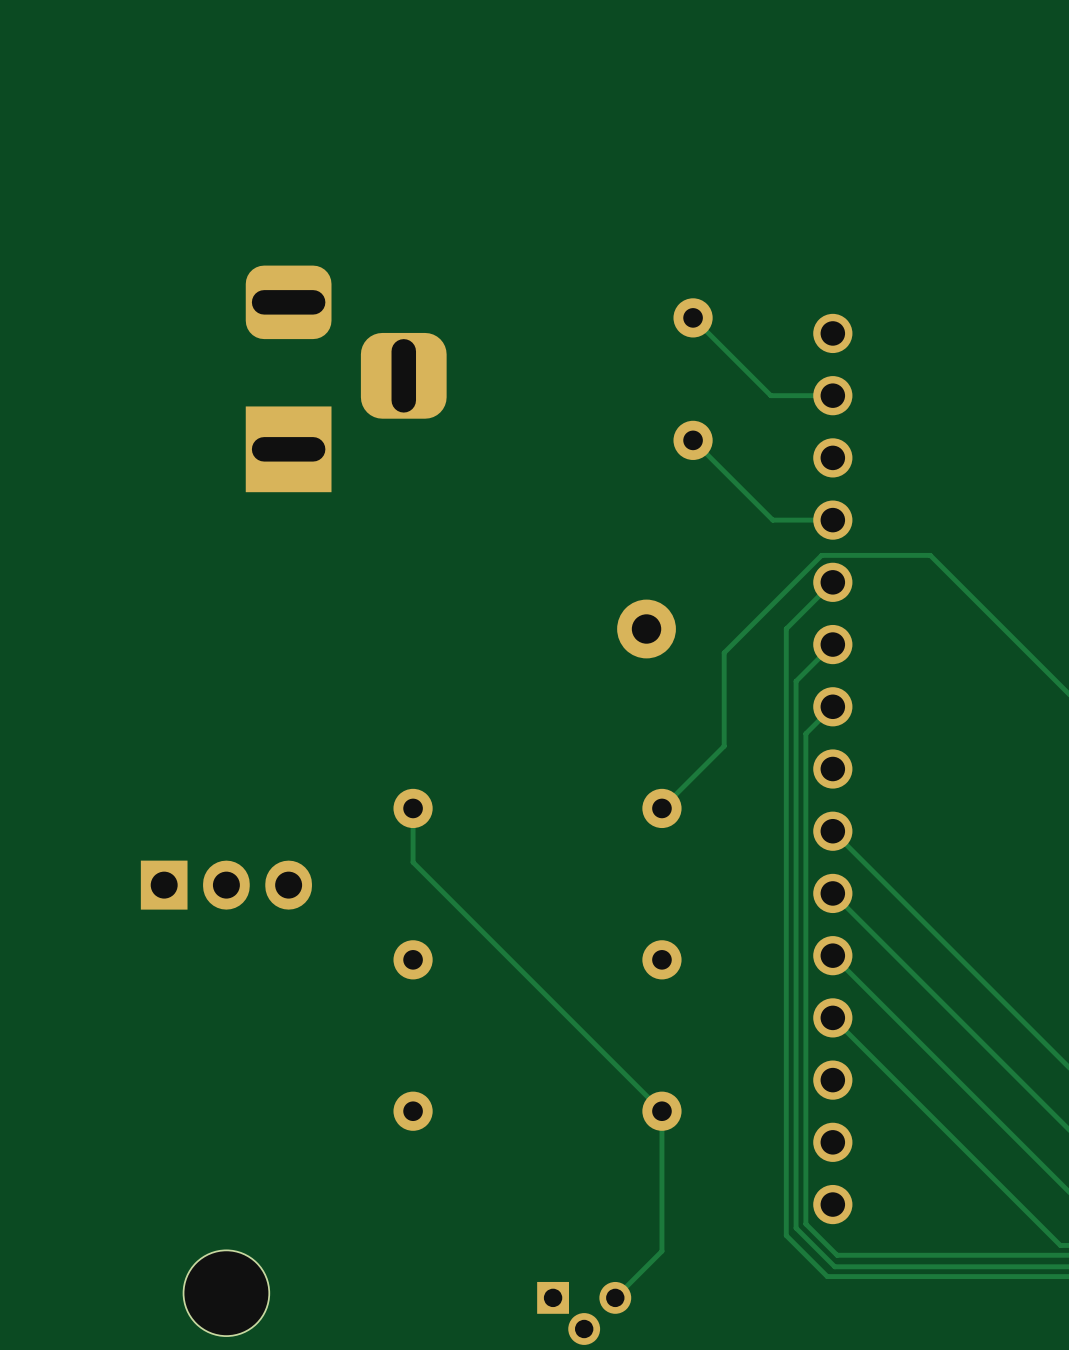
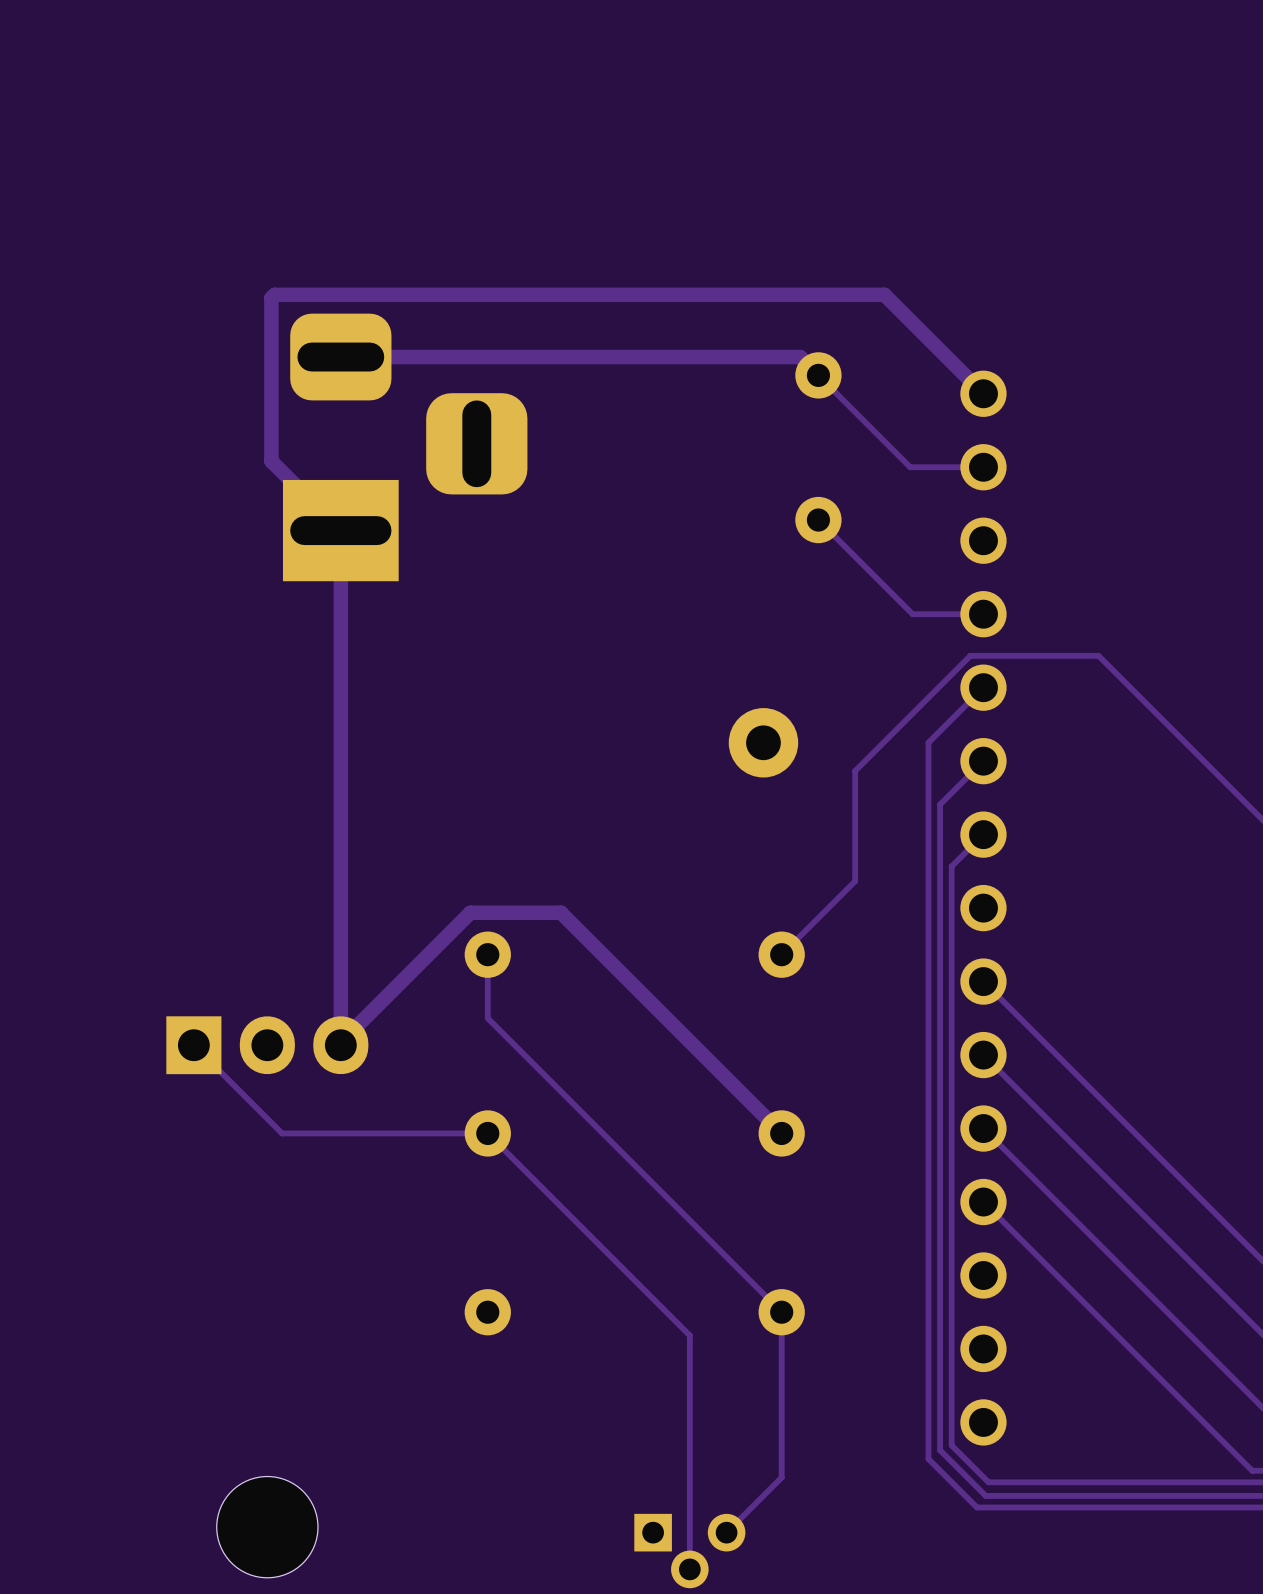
part footprint: [245, 265, 447, 493] -> [282, 313, 528, 582]
track: none -> (340, 357) (800, 357) (818, 375)
track: none -> (983, 393) (884, 294) (274, 294) (271, 298) (271, 461) (340, 530) (340, 1045)
track: none -> (340, 1042) (470, 912) (560, 912) (781, 1133)
track: none -> (193, 1045) (282, 1133) (487, 1133) (689, 1335) (689, 1569)

